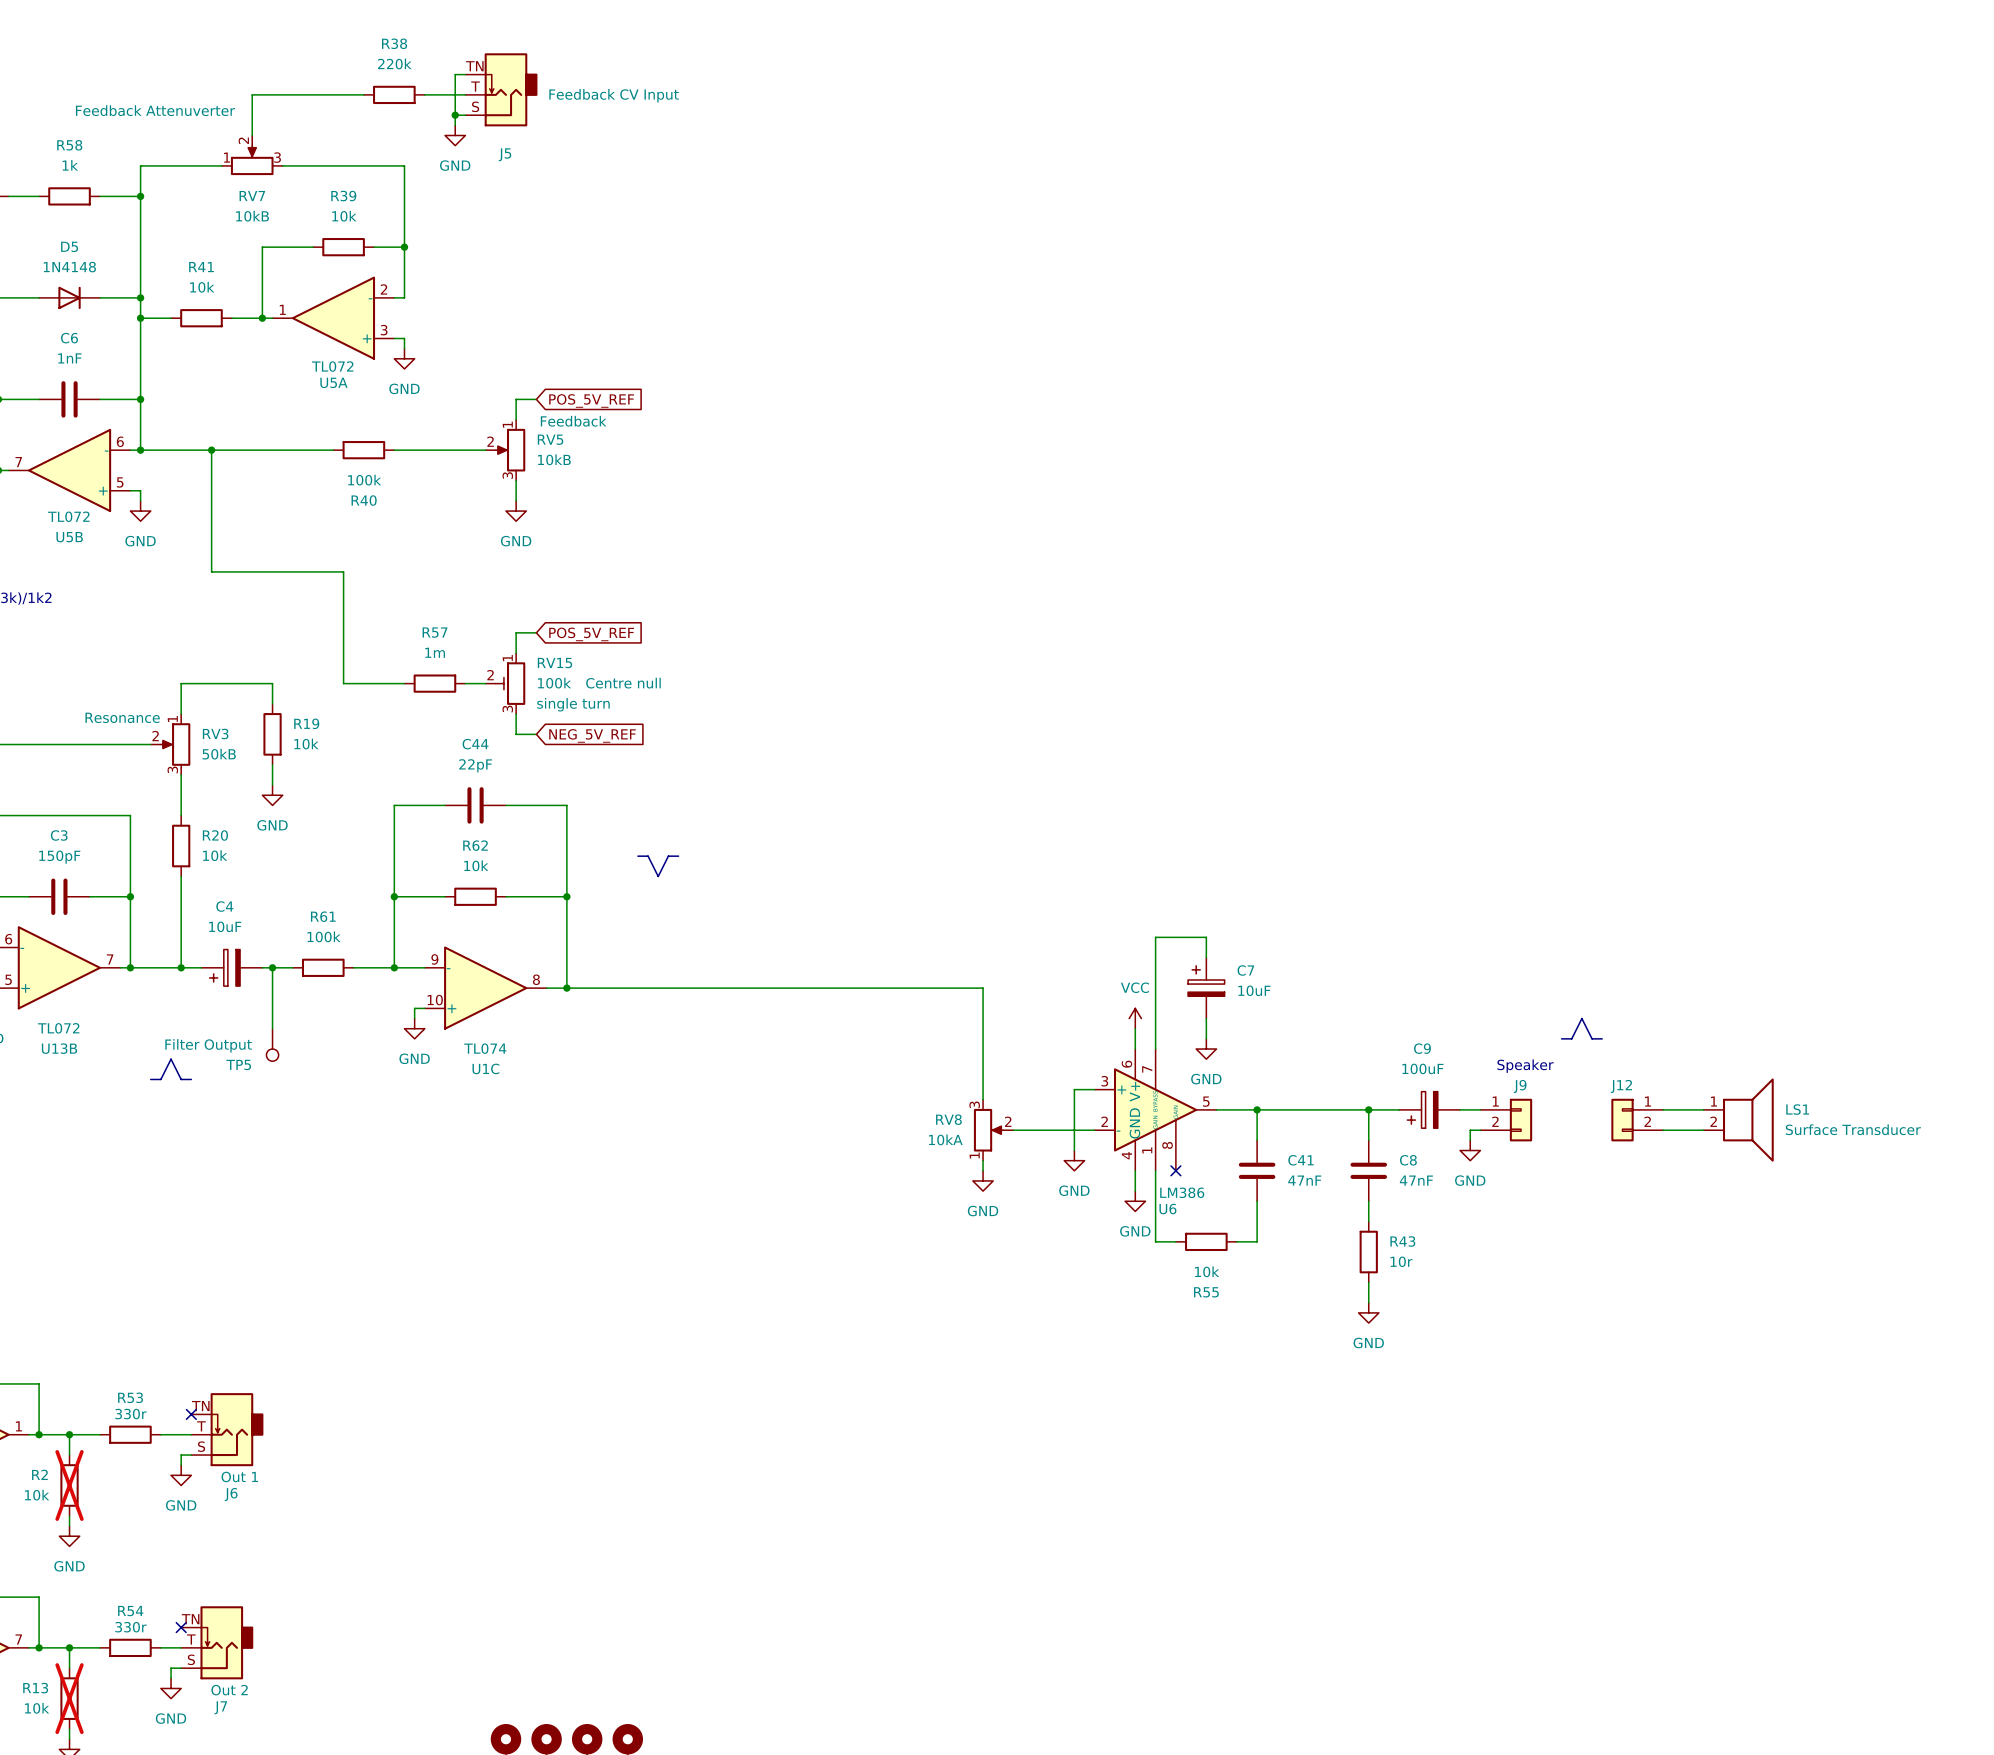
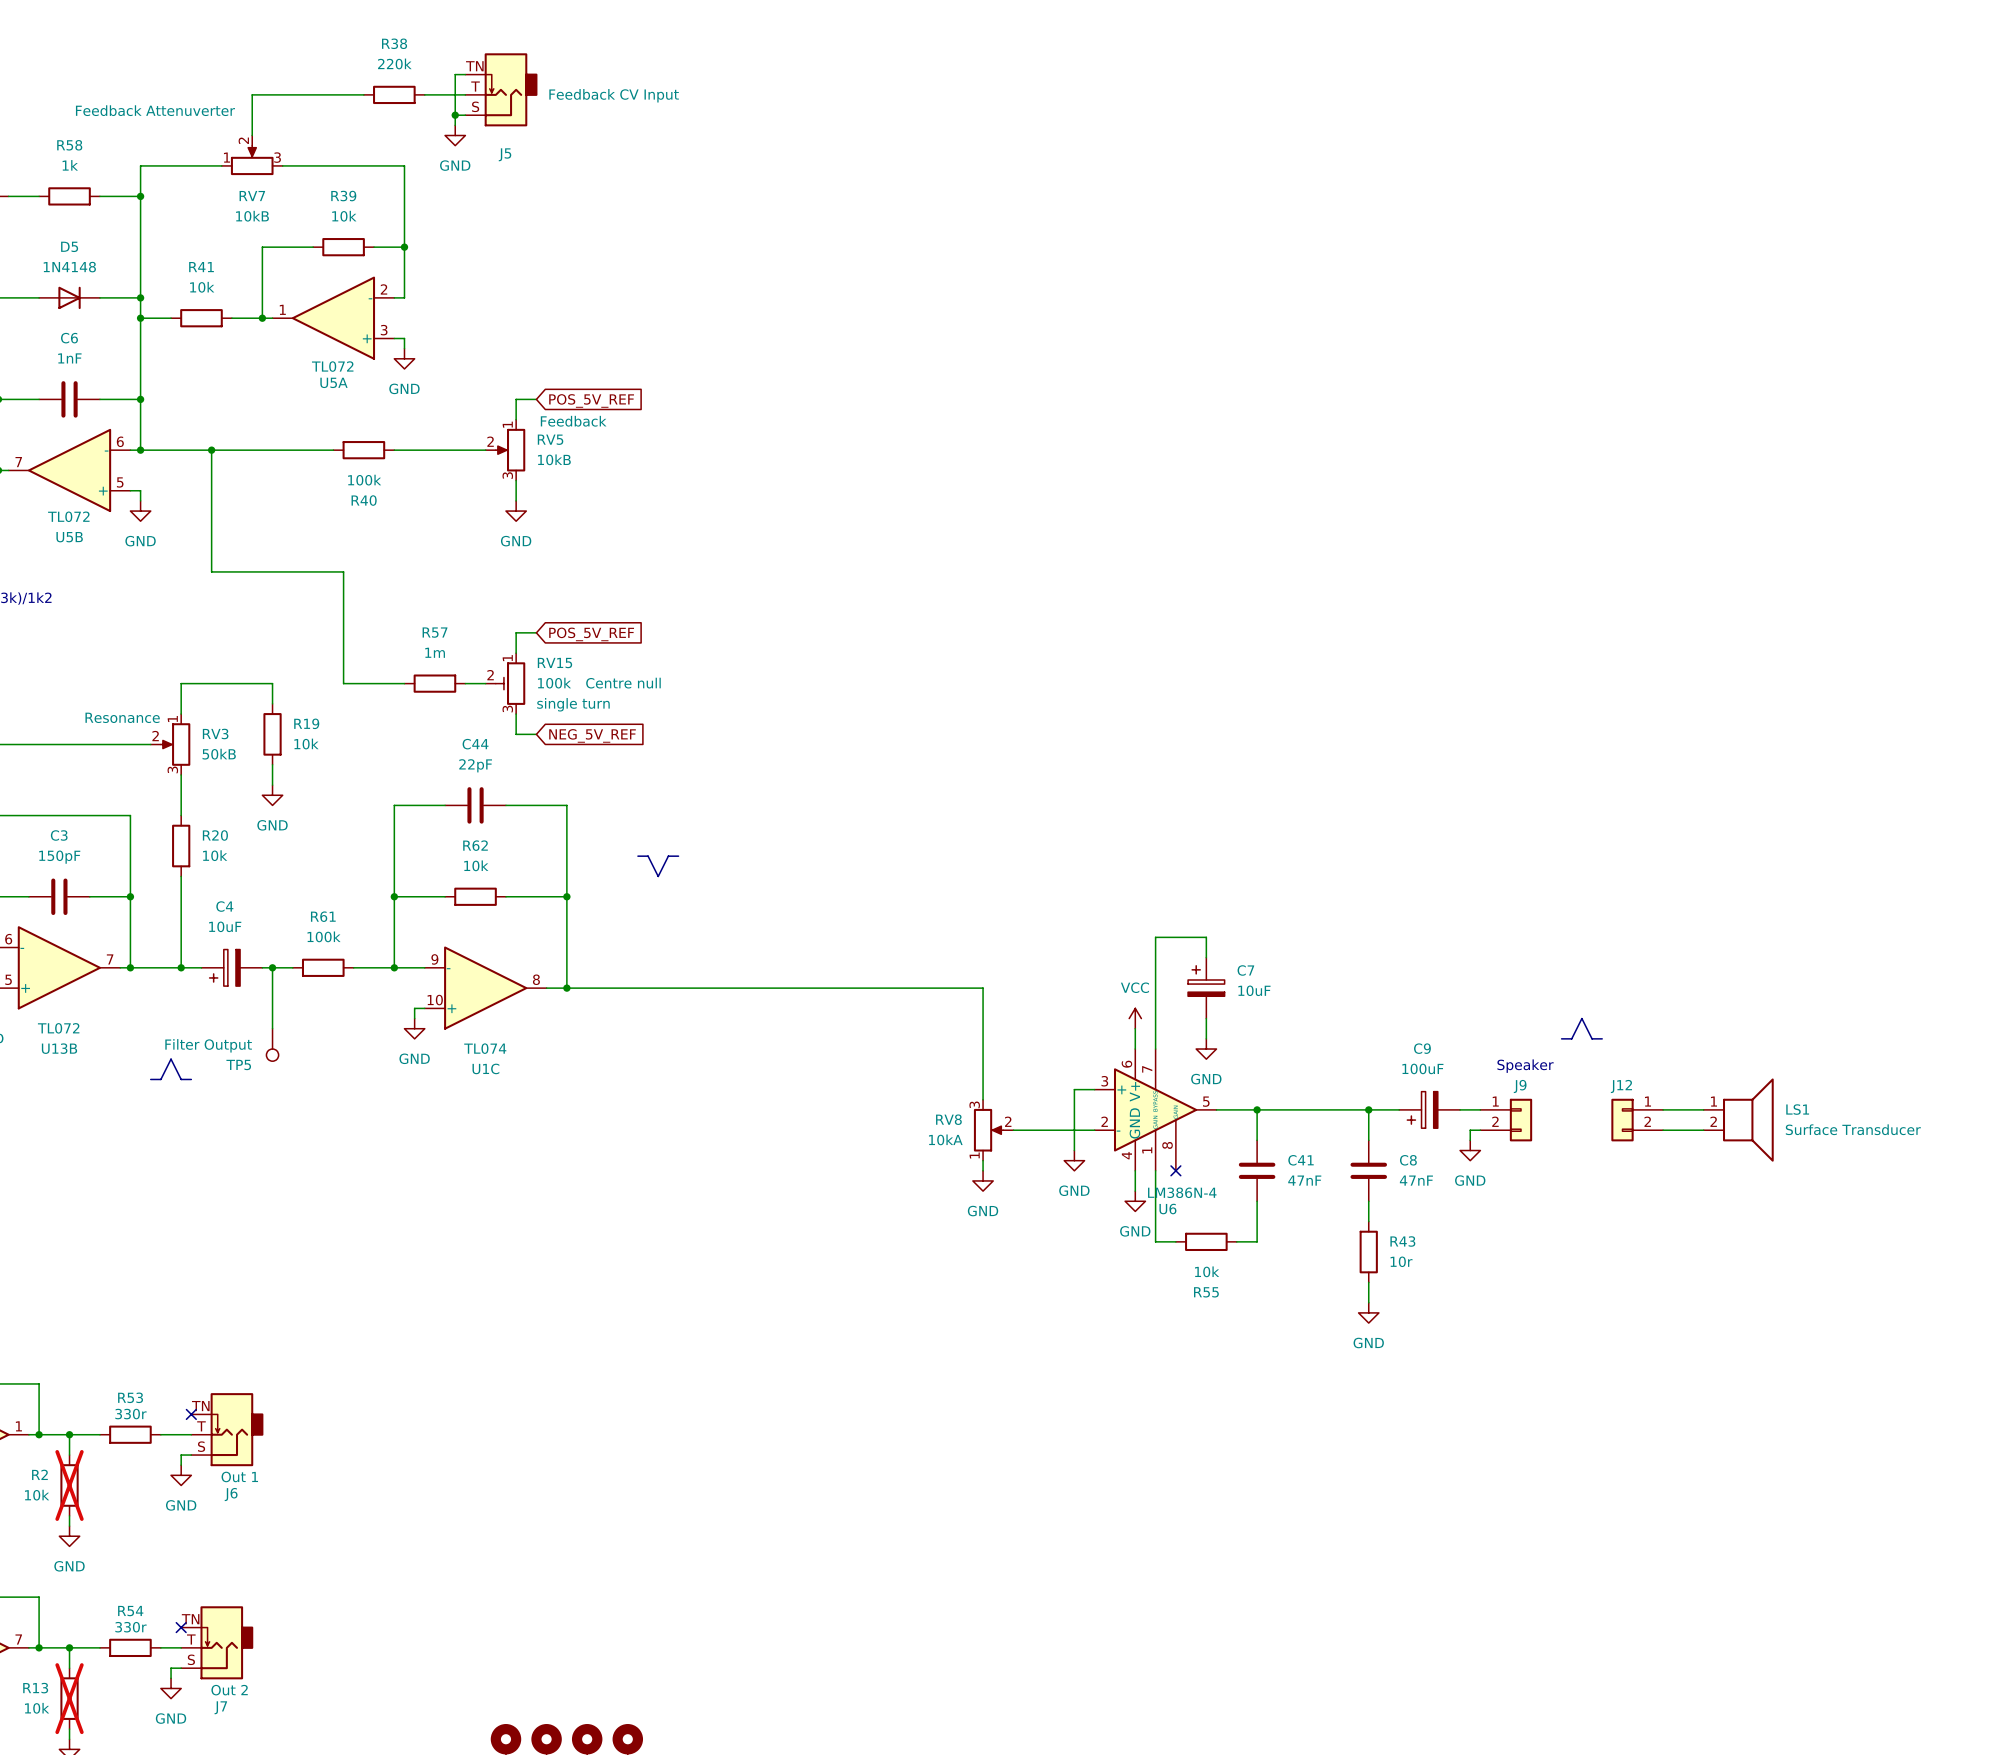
U6 value: LM386 (1182, 1192) -> LM386N-4 (1182, 1192)

